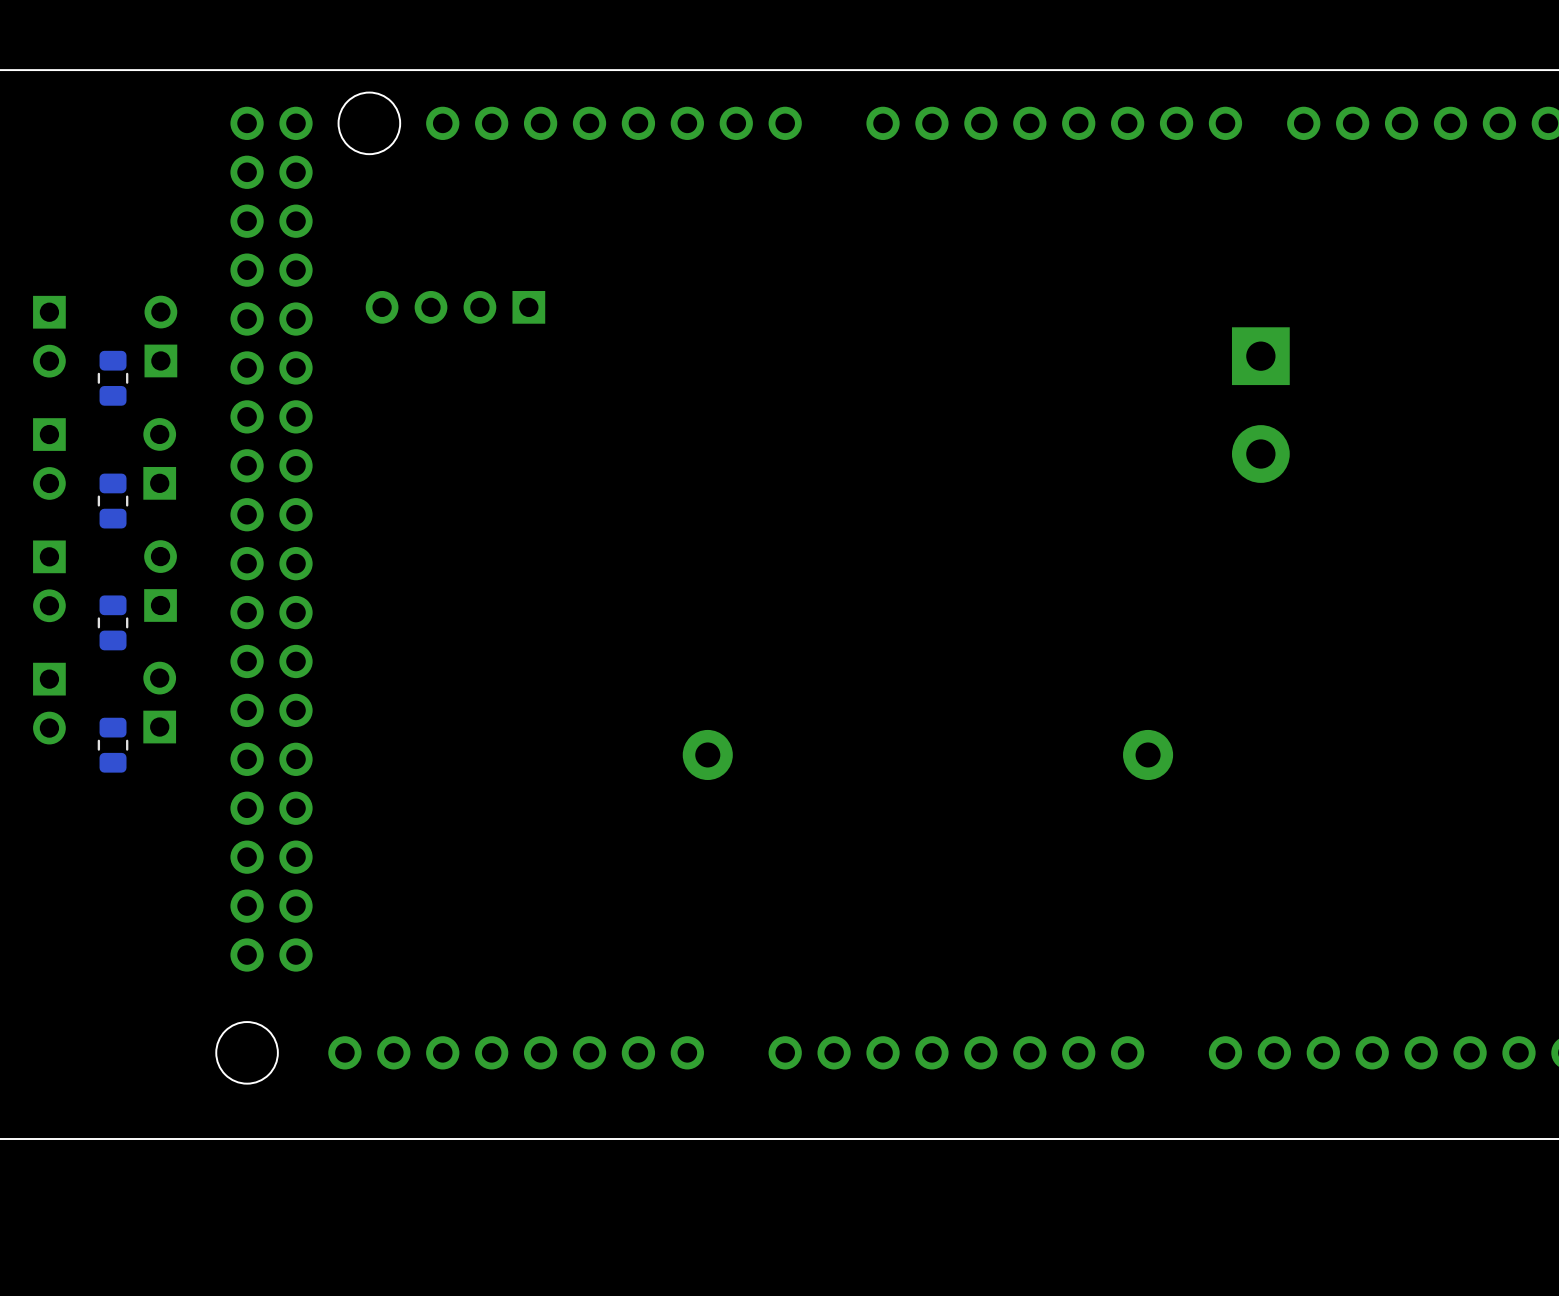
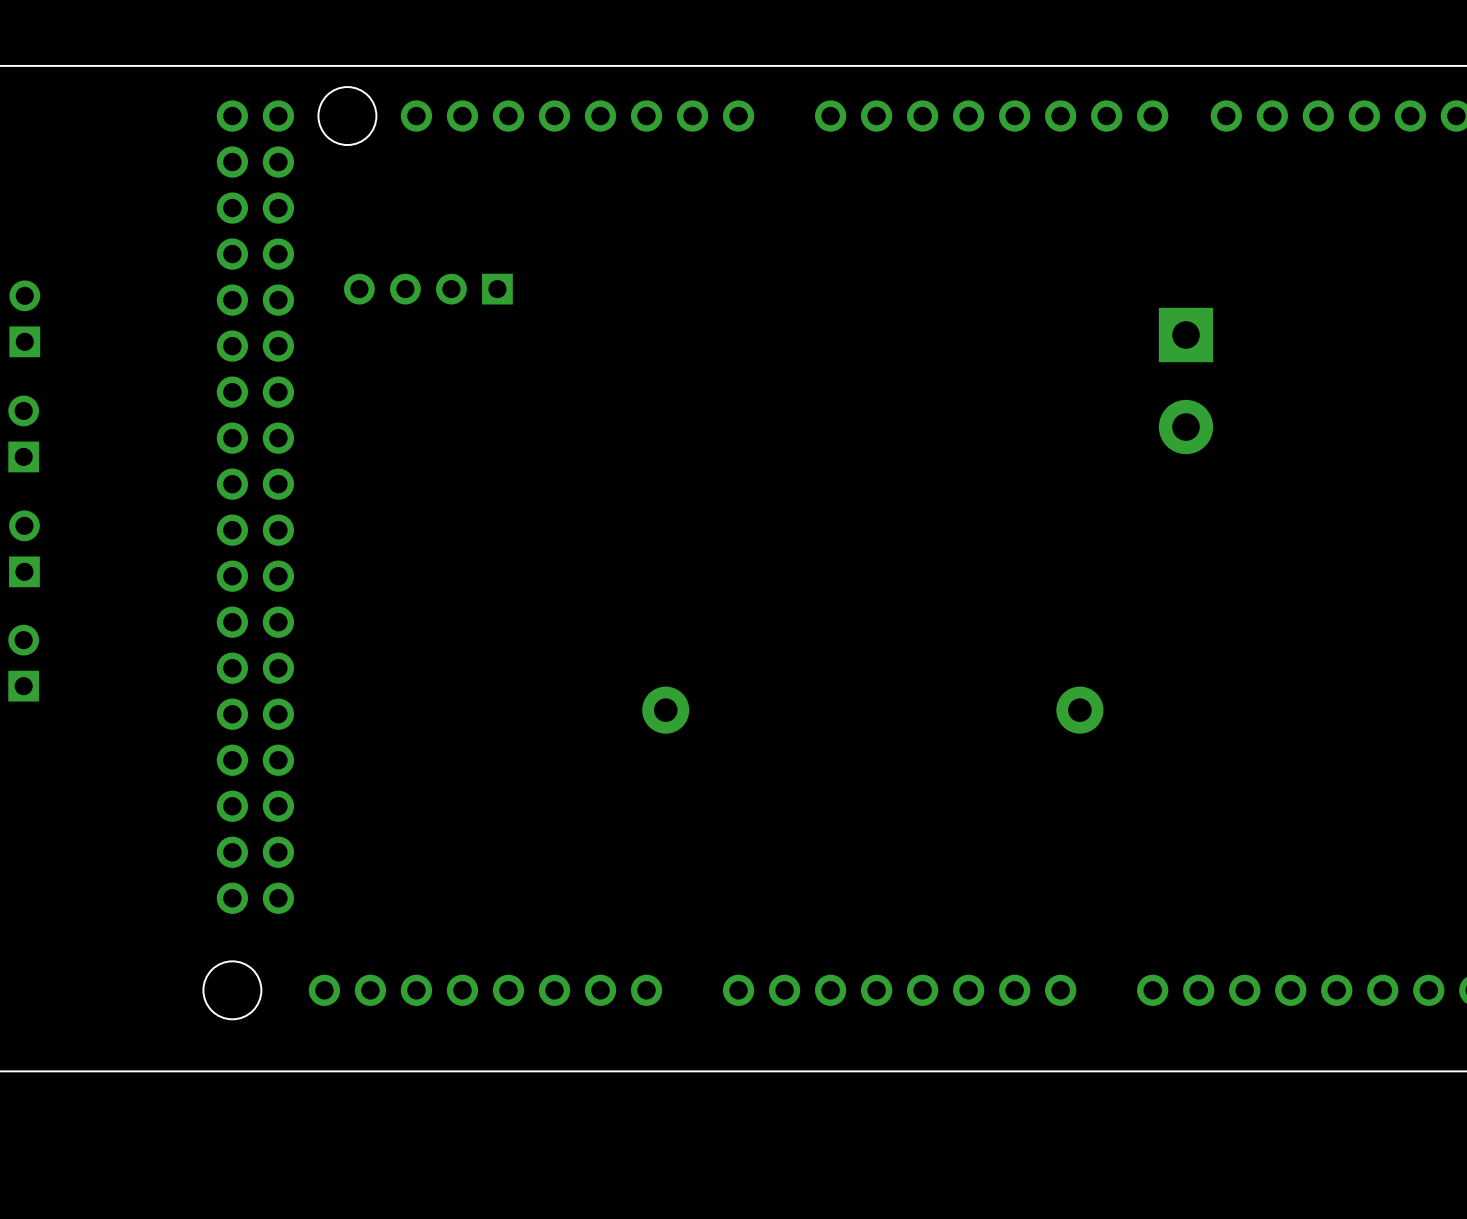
part rotation: 0° (49, 336) -> 180° (24, 318)
part: (160, 336) -> none
part: (113, 378) -> none
part: (159, 458) -> none
part rotation: 0° (49, 459) -> 180° (23, 433)
part: (113, 501) -> none
part rotation: 0° (49, 581) -> 180° (24, 548)
part: (160, 581) -> none
part: (113, 622) -> none
part: (159, 702) -> none
part rotation: 0° (49, 703) -> 180° (23, 663)
part: (113, 745) -> none

